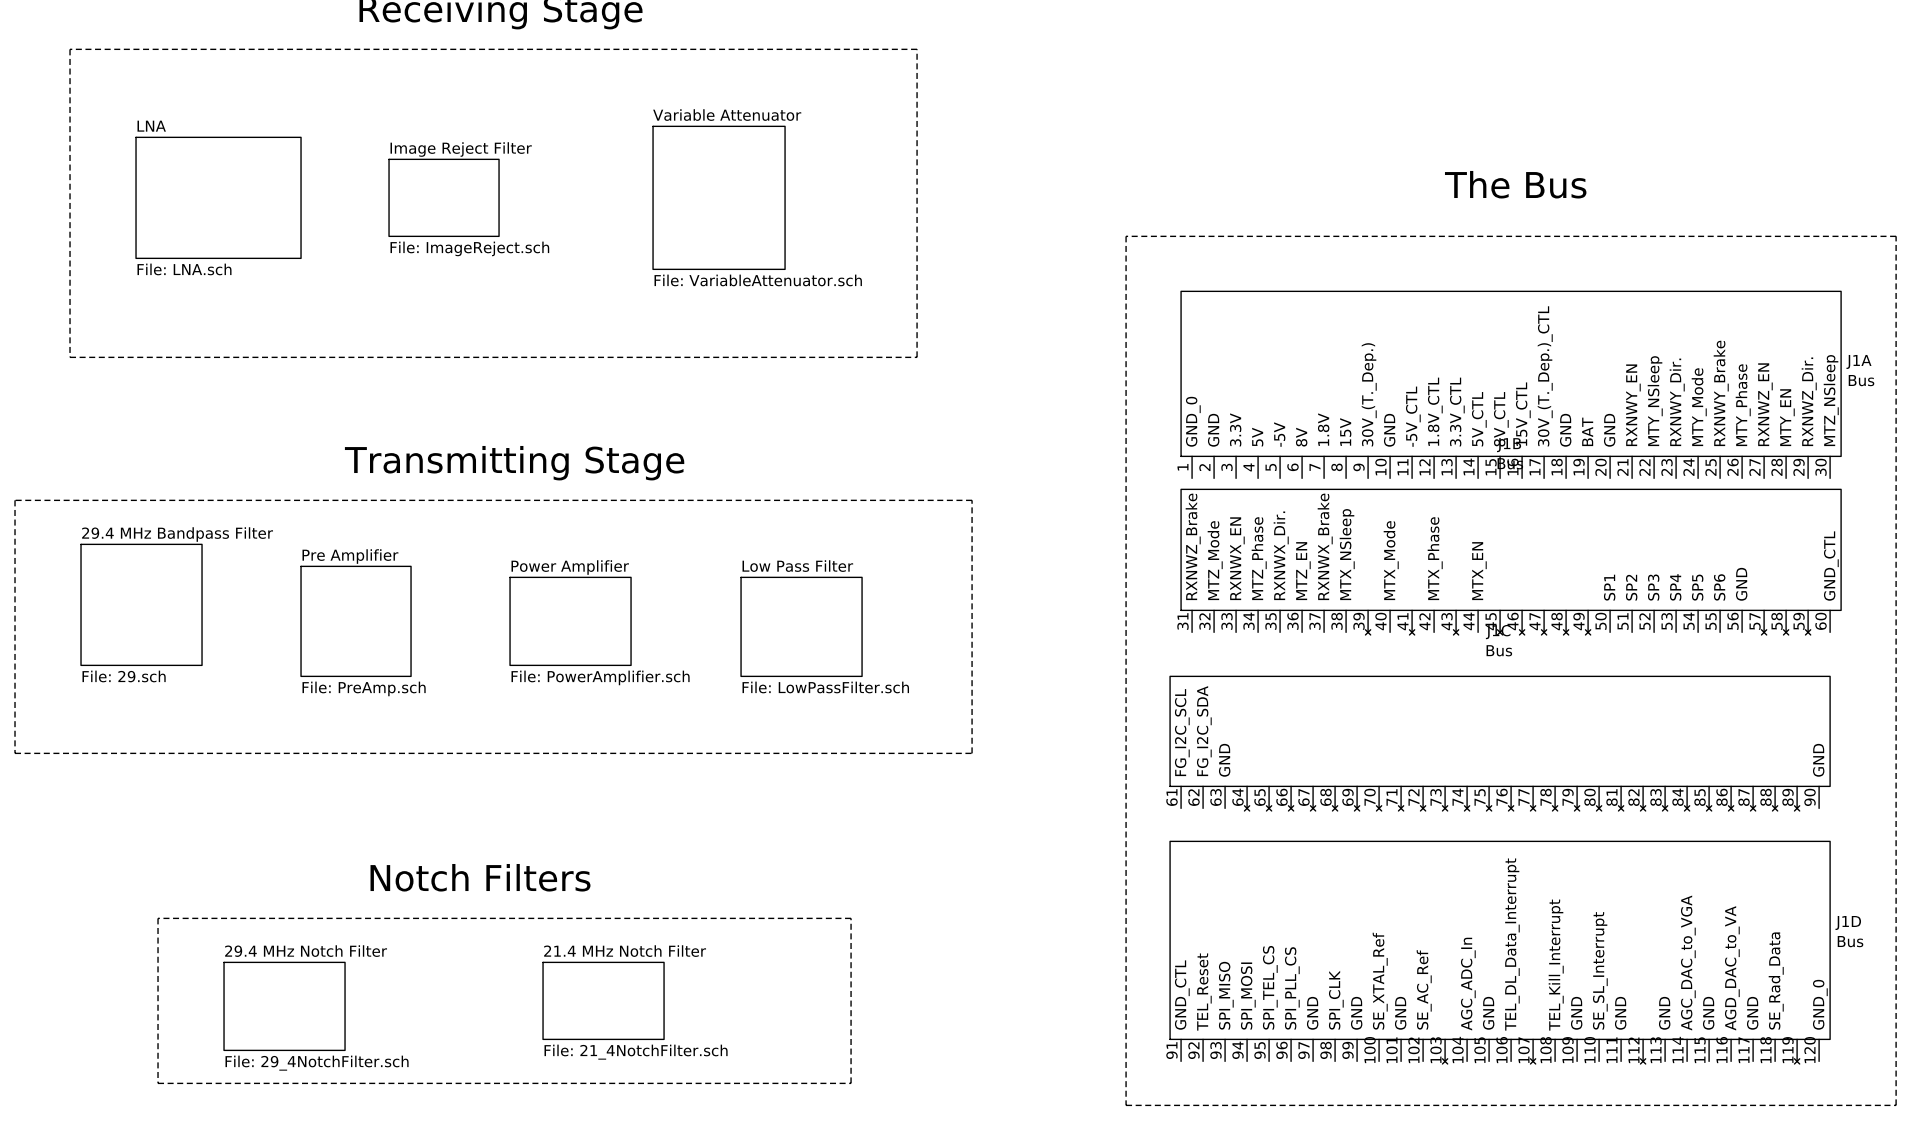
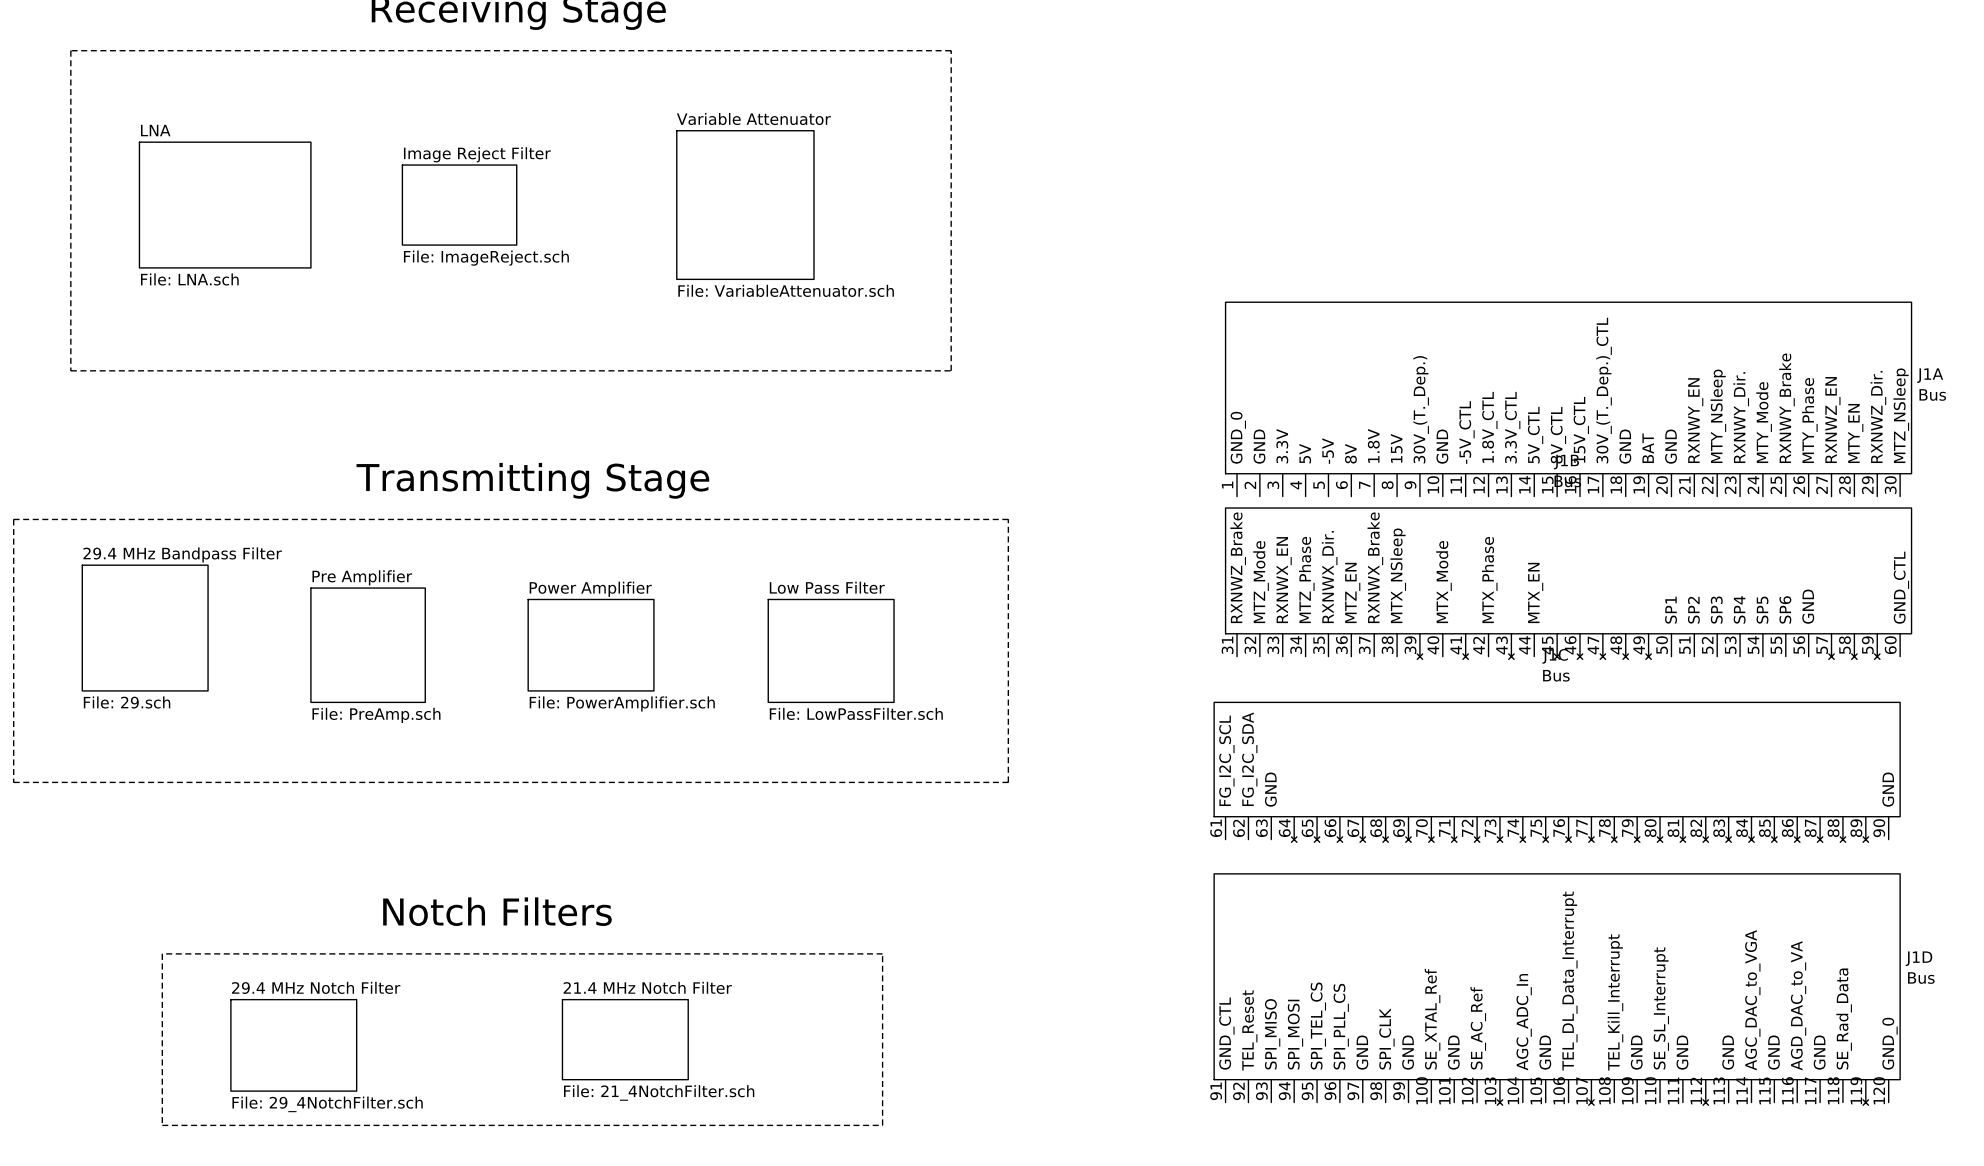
text: The Bus (1515, 184) -> none
line: (1126, 236) (1126, 1105) (1896, 1105) (1896, 236) (1126, 236) -> none

